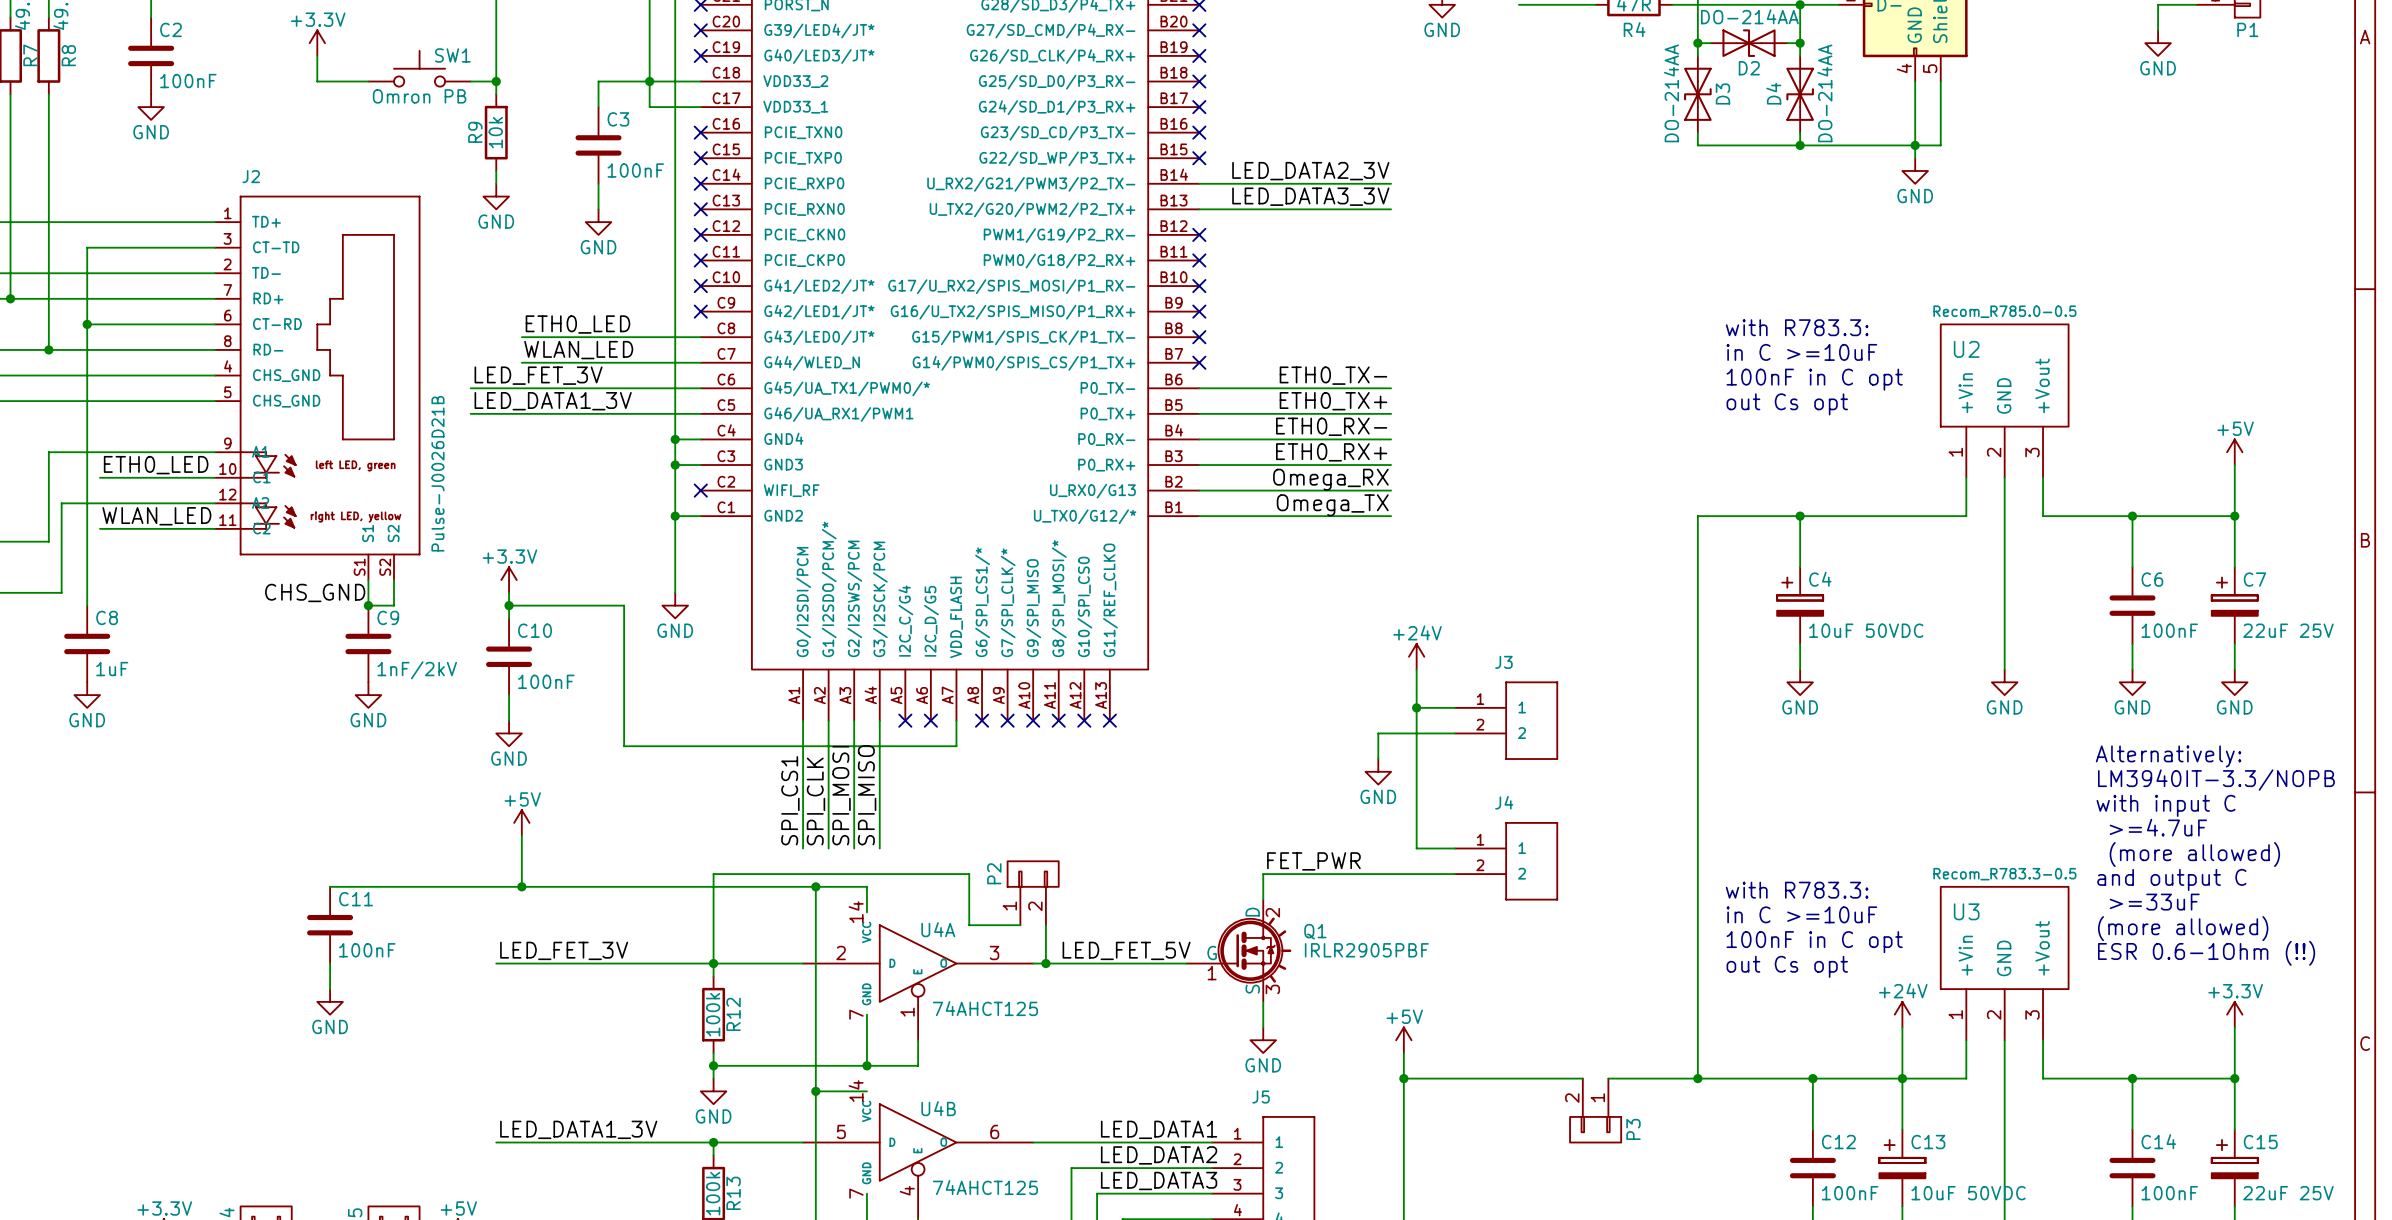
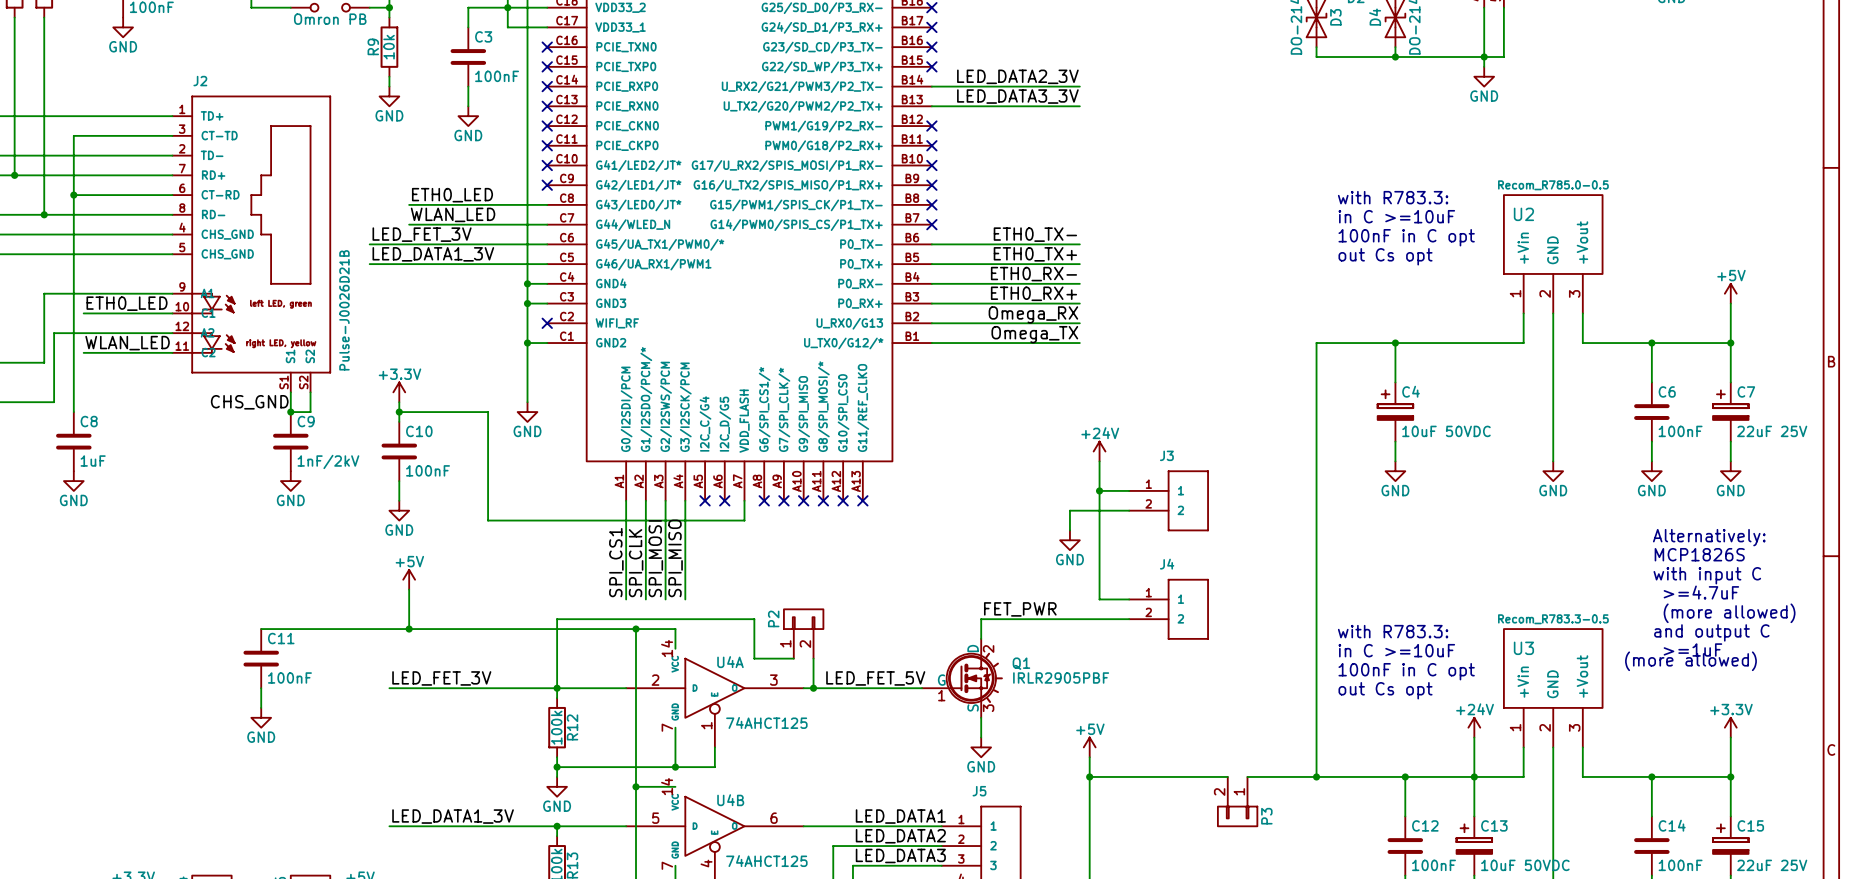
text position: Alternatively: (2168, 756) -> Alternatively: (1709, 537)
text: LM3940IT-3.3/NOPB (2216, 780) -> none
text: none -> MCP1826S (1699, 554)
text position: with input C (2166, 805) -> with input C (1707, 575)
text position: >=4.7uF (2158, 827) -> >=4.7uF (1701, 592)
text position: (more allowed) (2194, 854) -> (more allowed) (1729, 613)
text position: and output C (2171, 879) -> and output C (1711, 632)
text: >=33uF (2154, 902) -> >=1uF (1692, 649)
text: ESR 0.6-1Ohm (!!) (2206, 953) -> none

